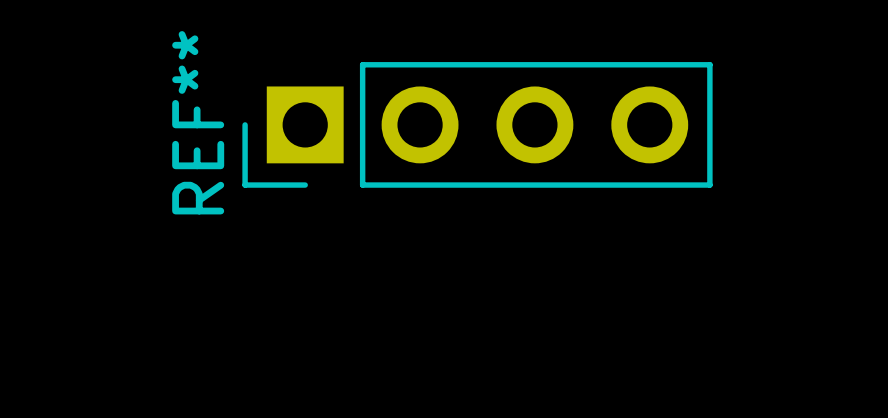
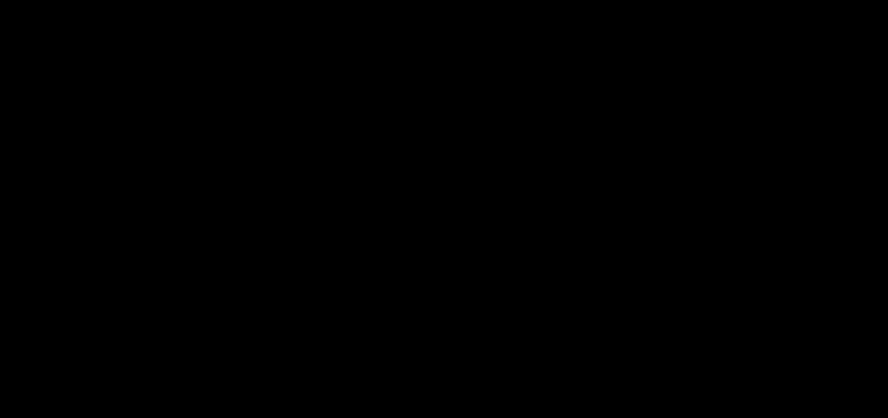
REF**: (477, 124) -> none

